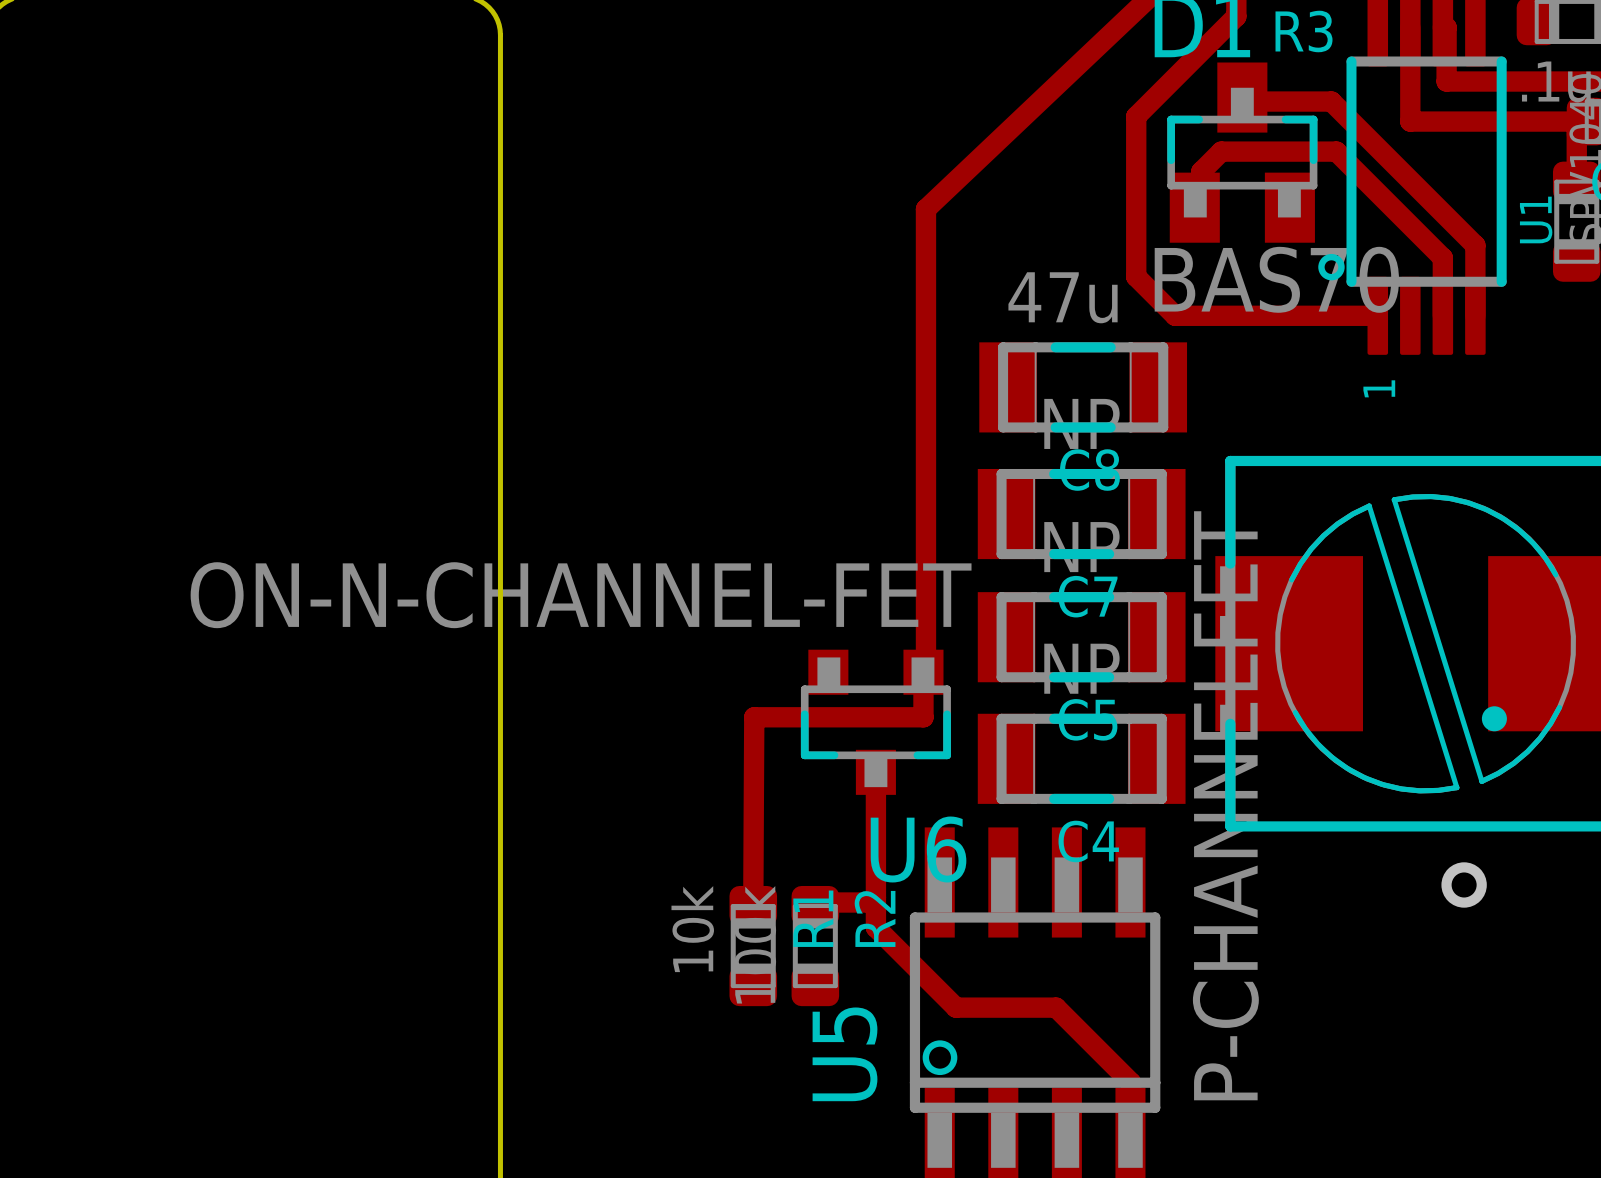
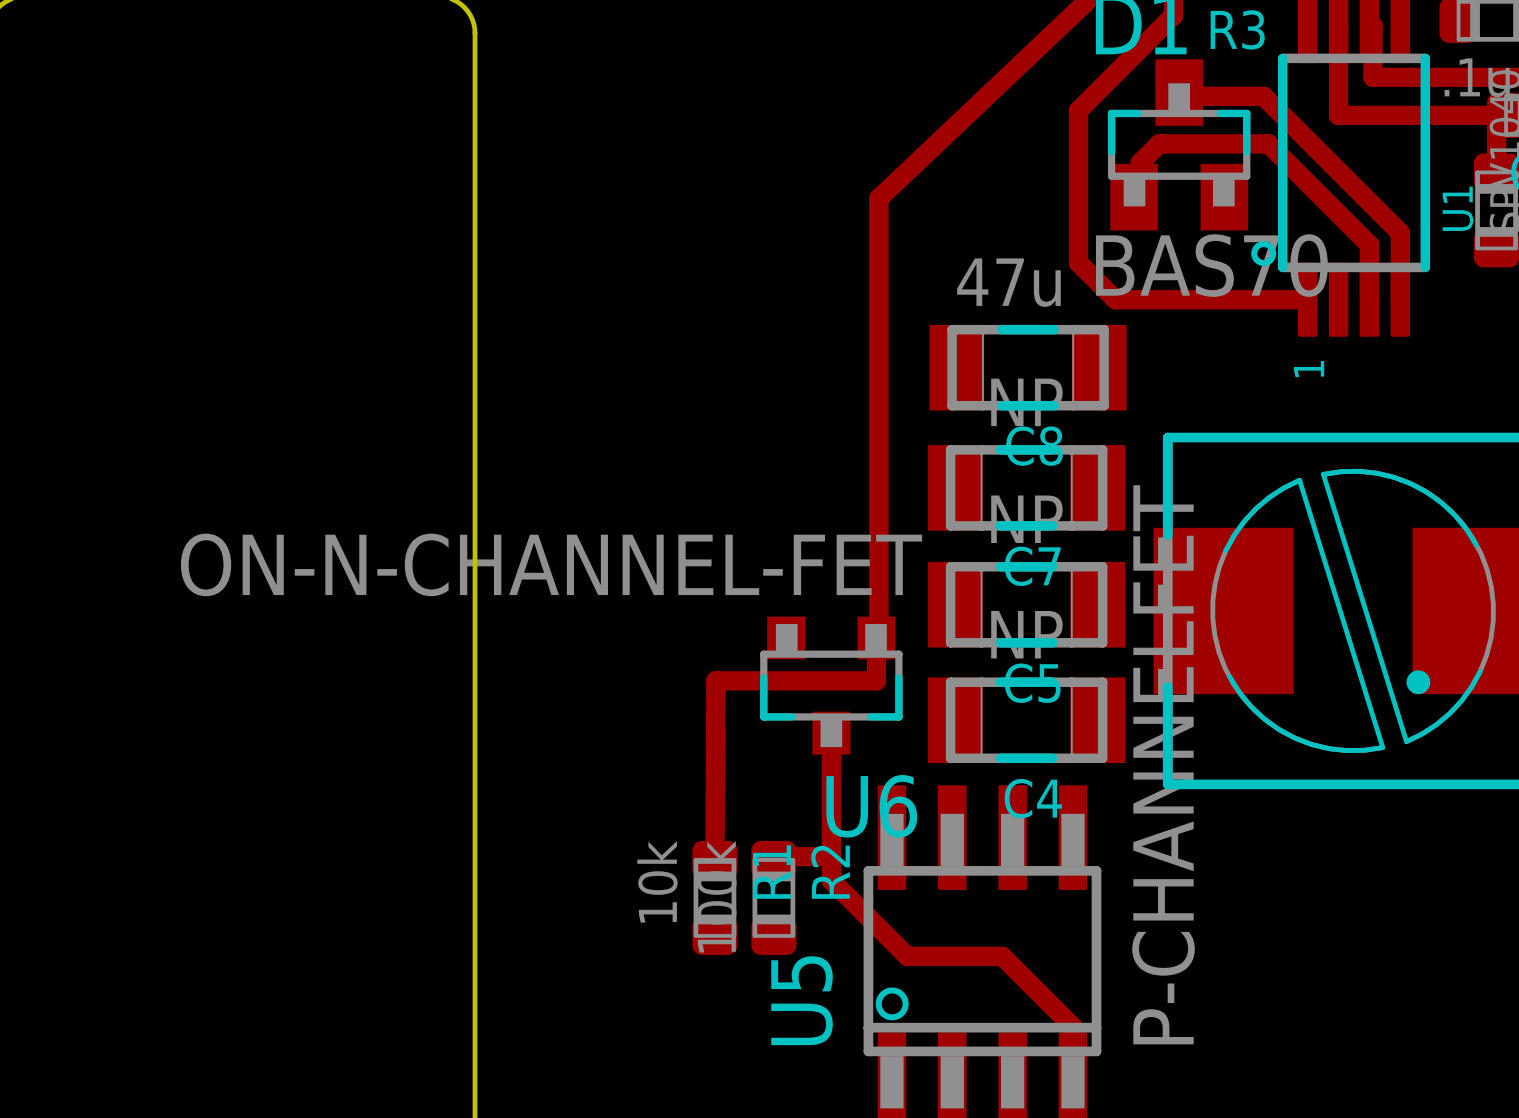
via: (1464, 884) -> none

